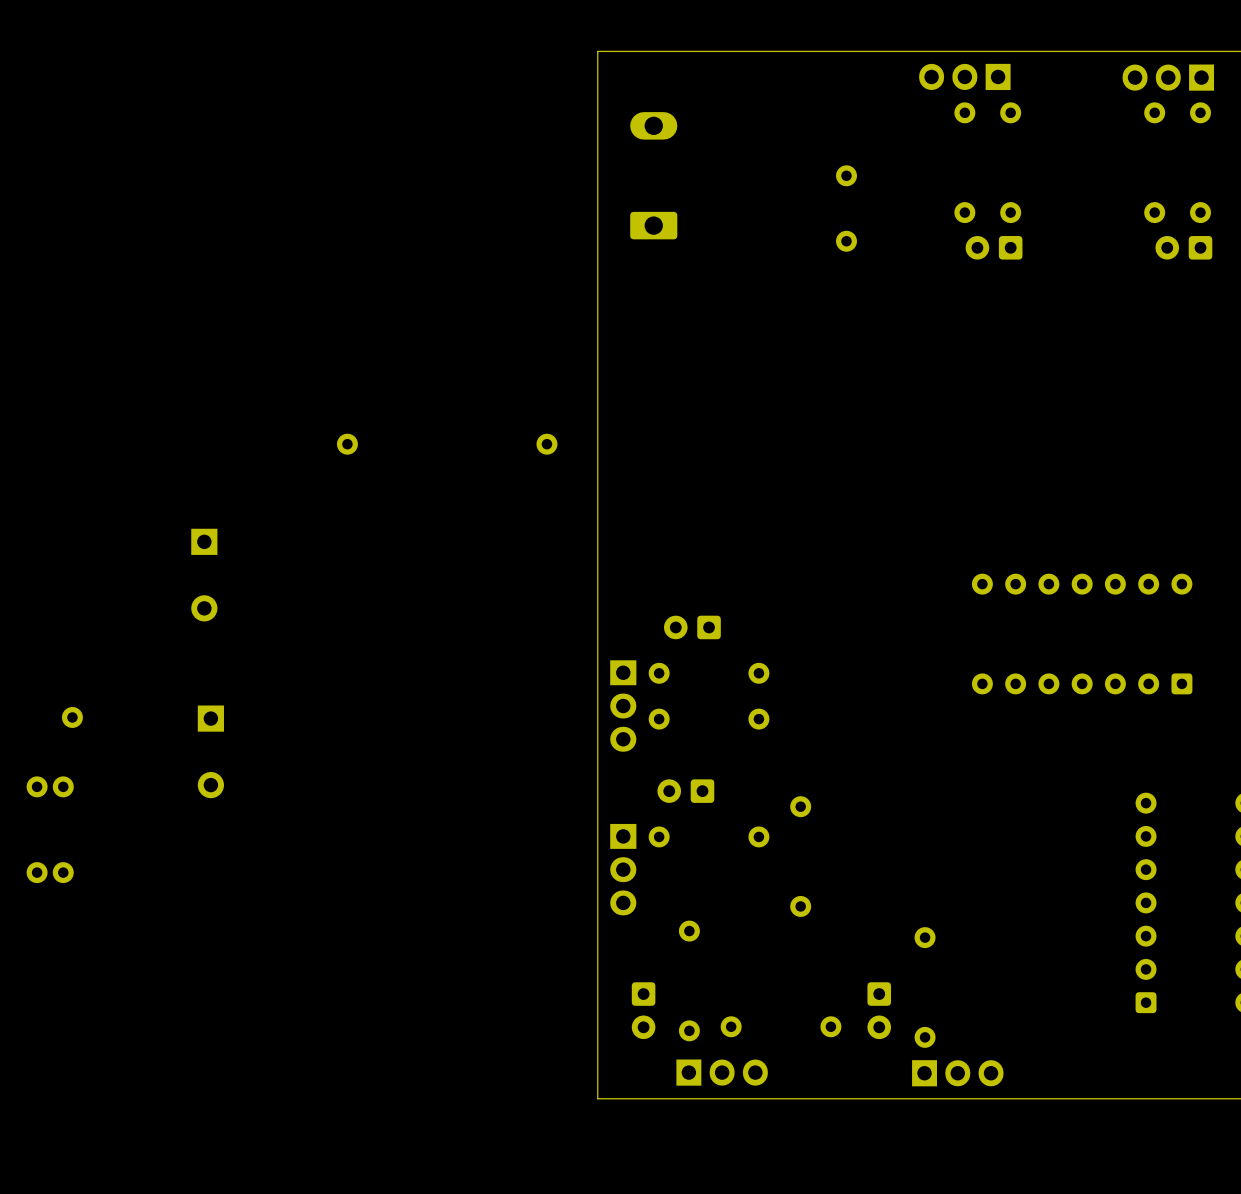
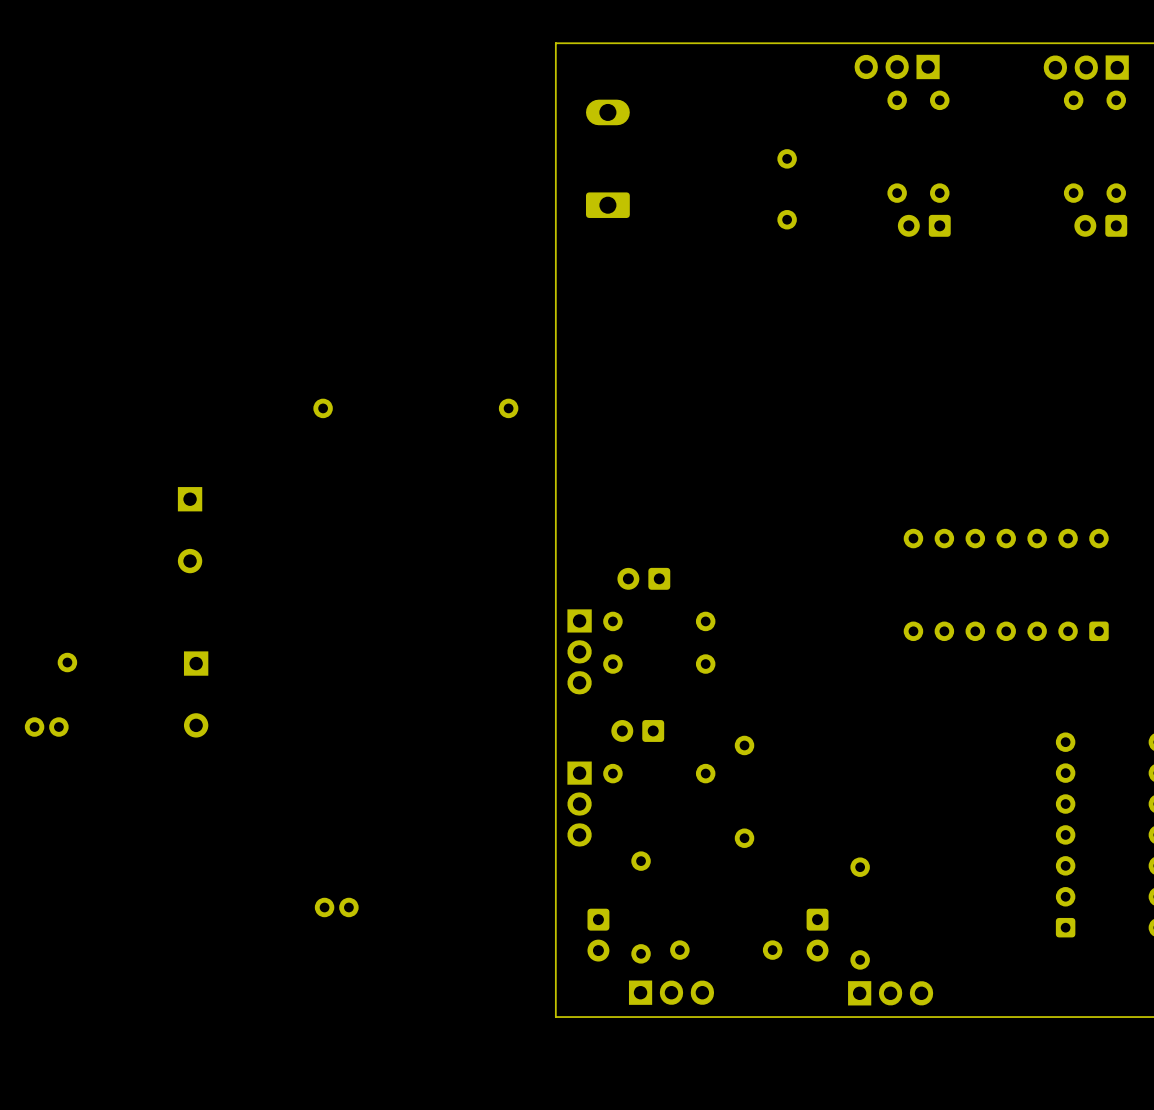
part: (50, 872) -> none
part: none -> (336, 907)

